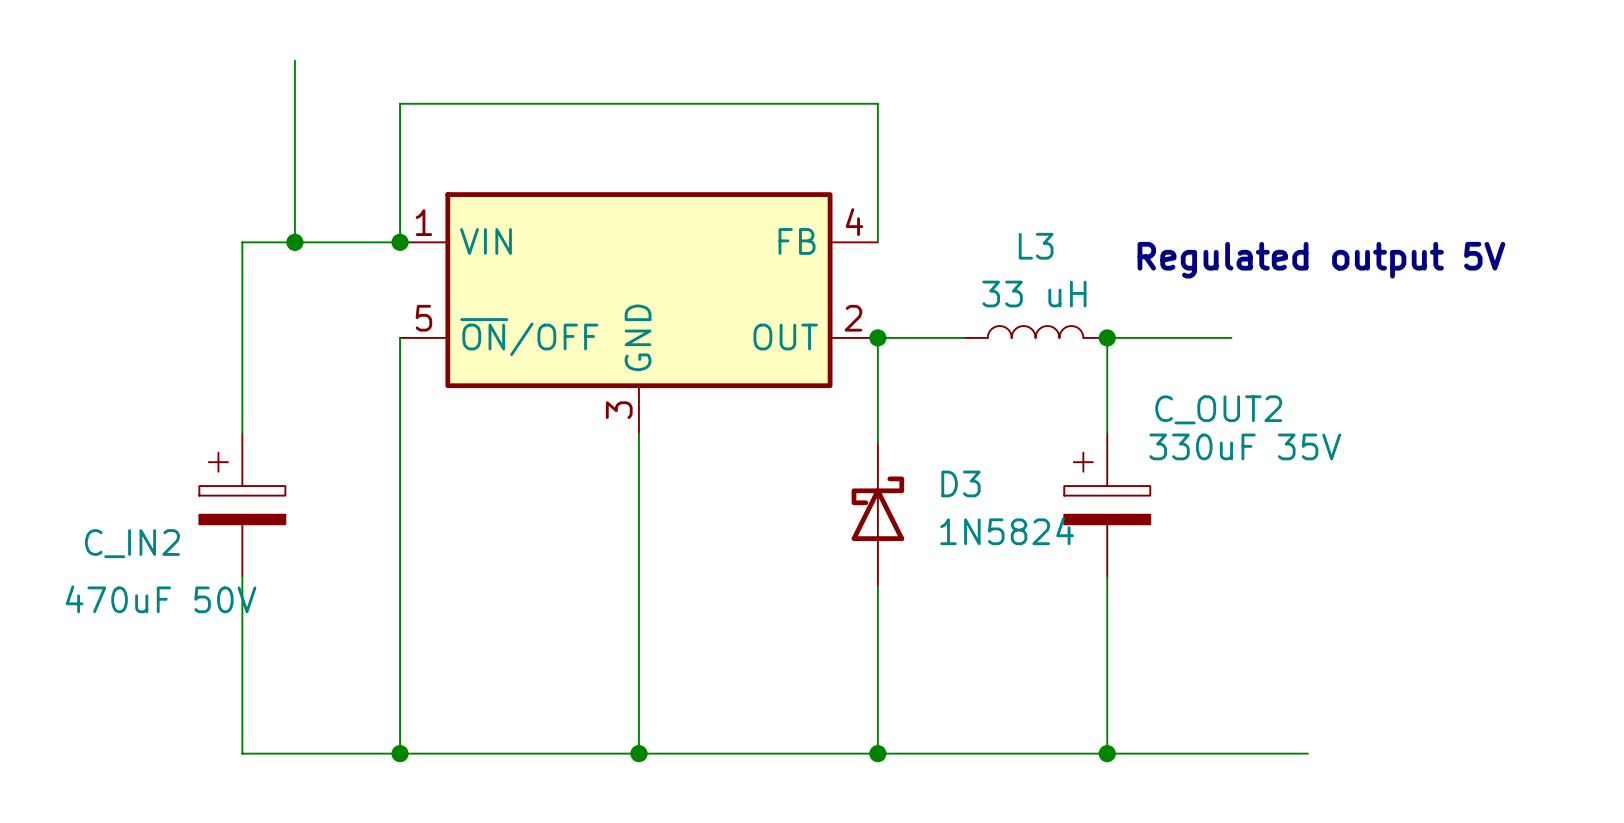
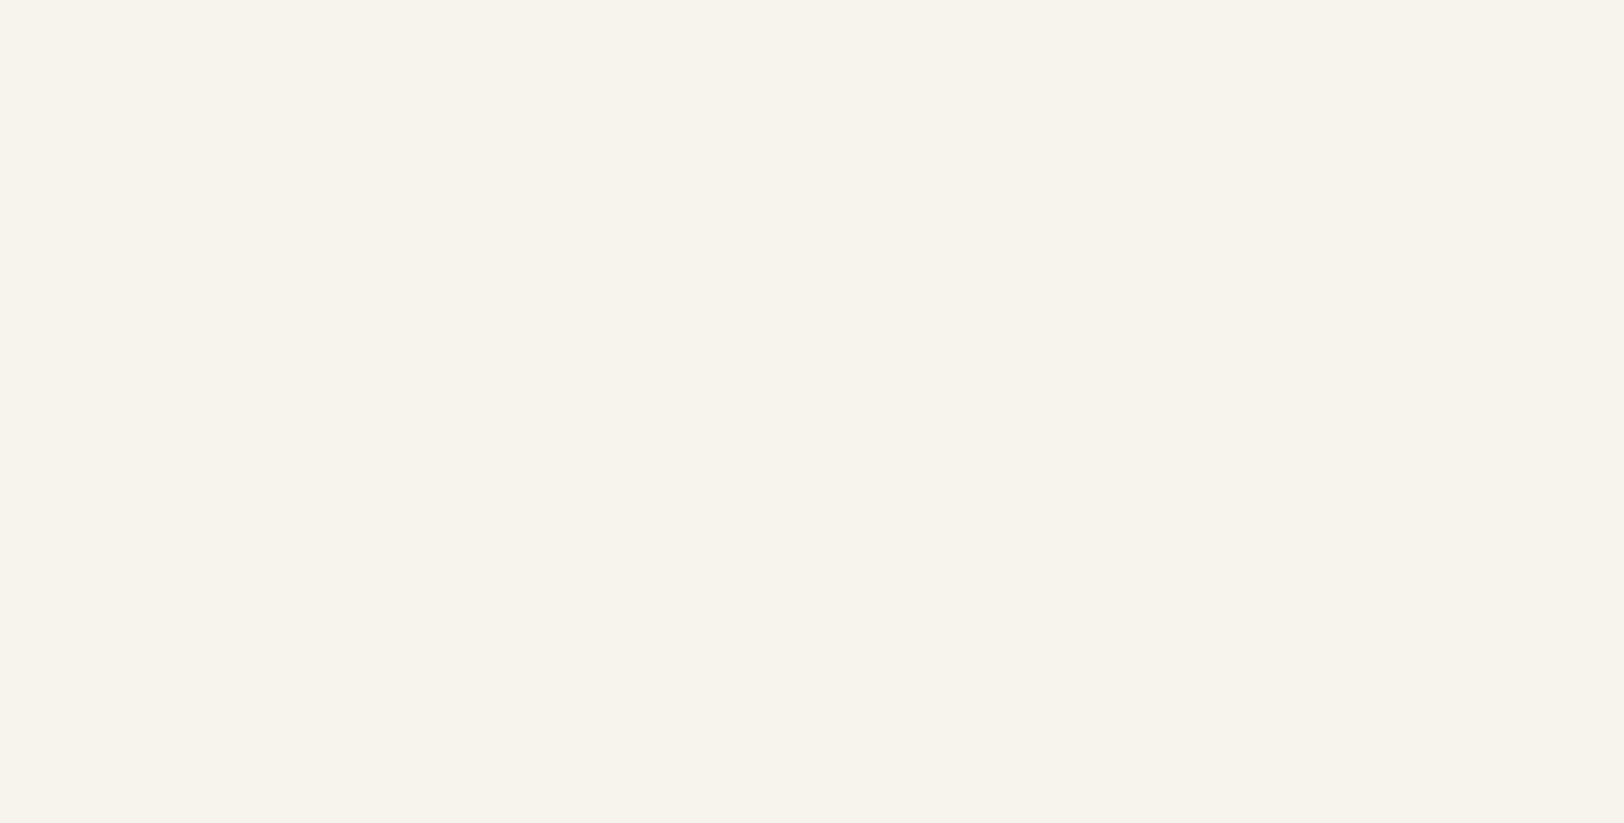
wire: (294, 60) (294, 242) -> none
junction: (294, 242) -> none
wire: (400, 242) (400, 103) (877, 103) (877, 242) -> none
junction: (400, 242) -> none
wire: (409, 242) (242, 242) (242, 433) -> none
text: Regulated output 5V (1321, 260) -> none
part: (638, 312) -> none
L3: 33 uH (1035, 331) -> none
wire: (400, 337) (400, 753) -> none
junction: (877, 337) -> none
wire: (963, 337) (877, 337) (877, 443) -> none
junction: (1107, 337) -> none
wire: (1231, 337) (1107, 337) (1107, 433) -> none
wire: (638, 433) (638, 753) -> none
C_IN2: 470uF 50V (242, 505) -> none
C_OUT2: 330uF 35V (1107, 505) -> none
D3: 1N5824 (877, 514) -> none
wire: (242, 576) (242, 753) (1307, 753) -> none
wire: (1107, 576) (1107, 753) -> none
wire: (877, 586) (877, 753) -> none
junction: (400, 753) -> none
junction: (638, 753) -> none
junction: (877, 753) -> none
junction: (1107, 753) -> none

